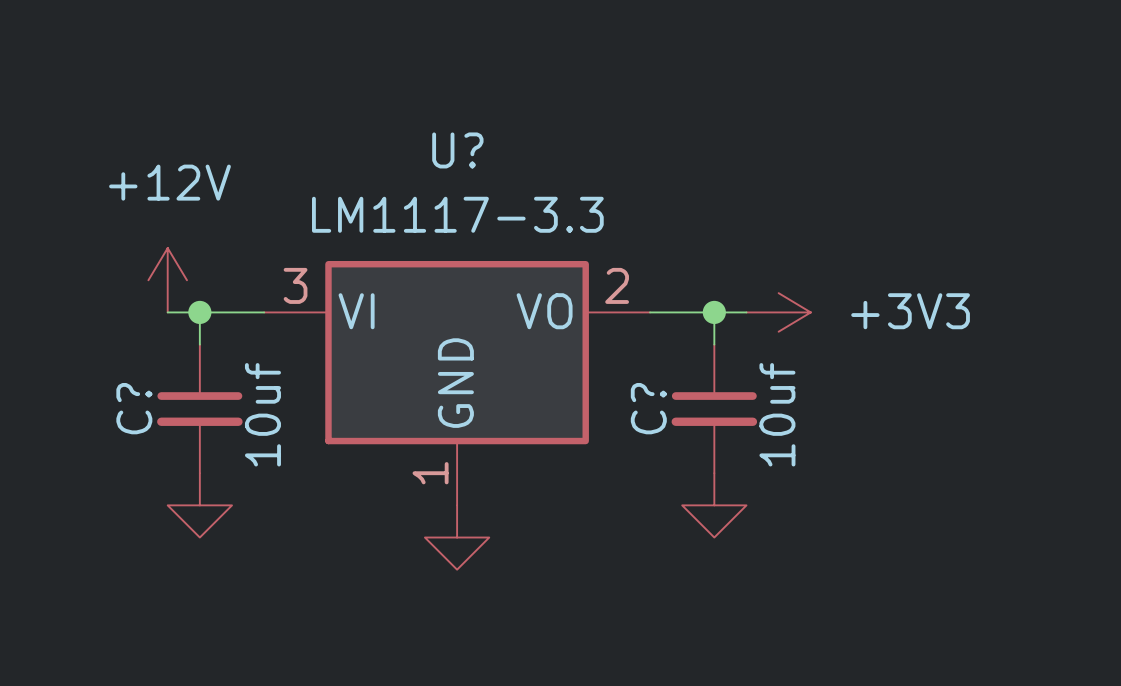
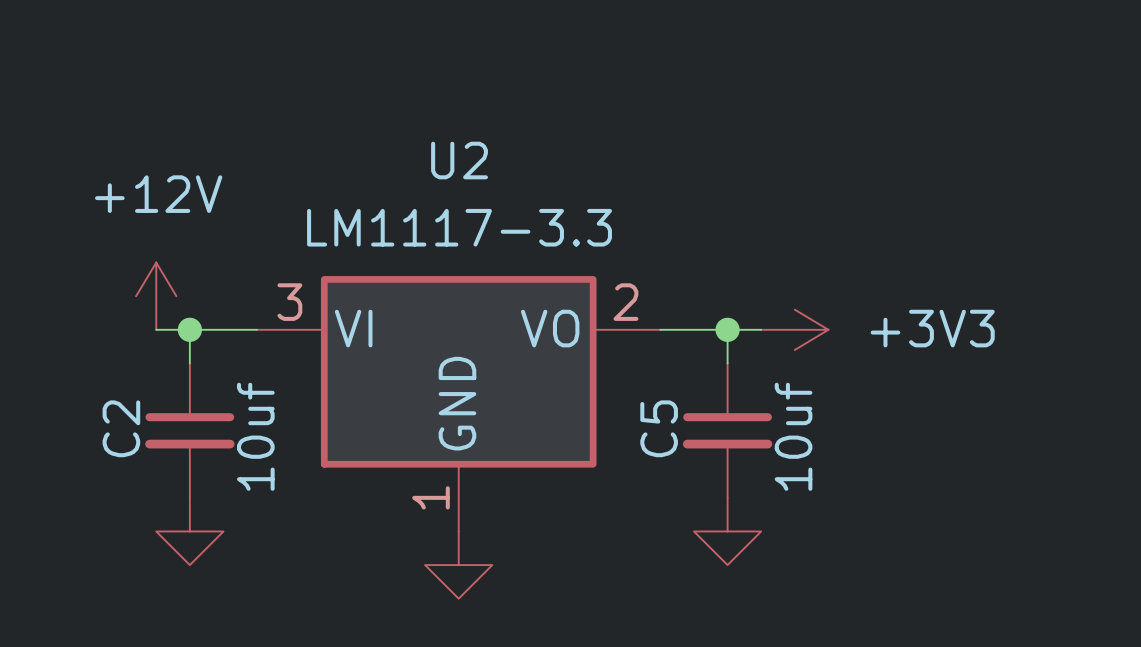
U? name: U? (457, 150) -> U2 (459, 160)
C? name: C? (134, 408) -> C2 (121, 428)
C? name: C? (648, 408) -> C5 (659, 428)

